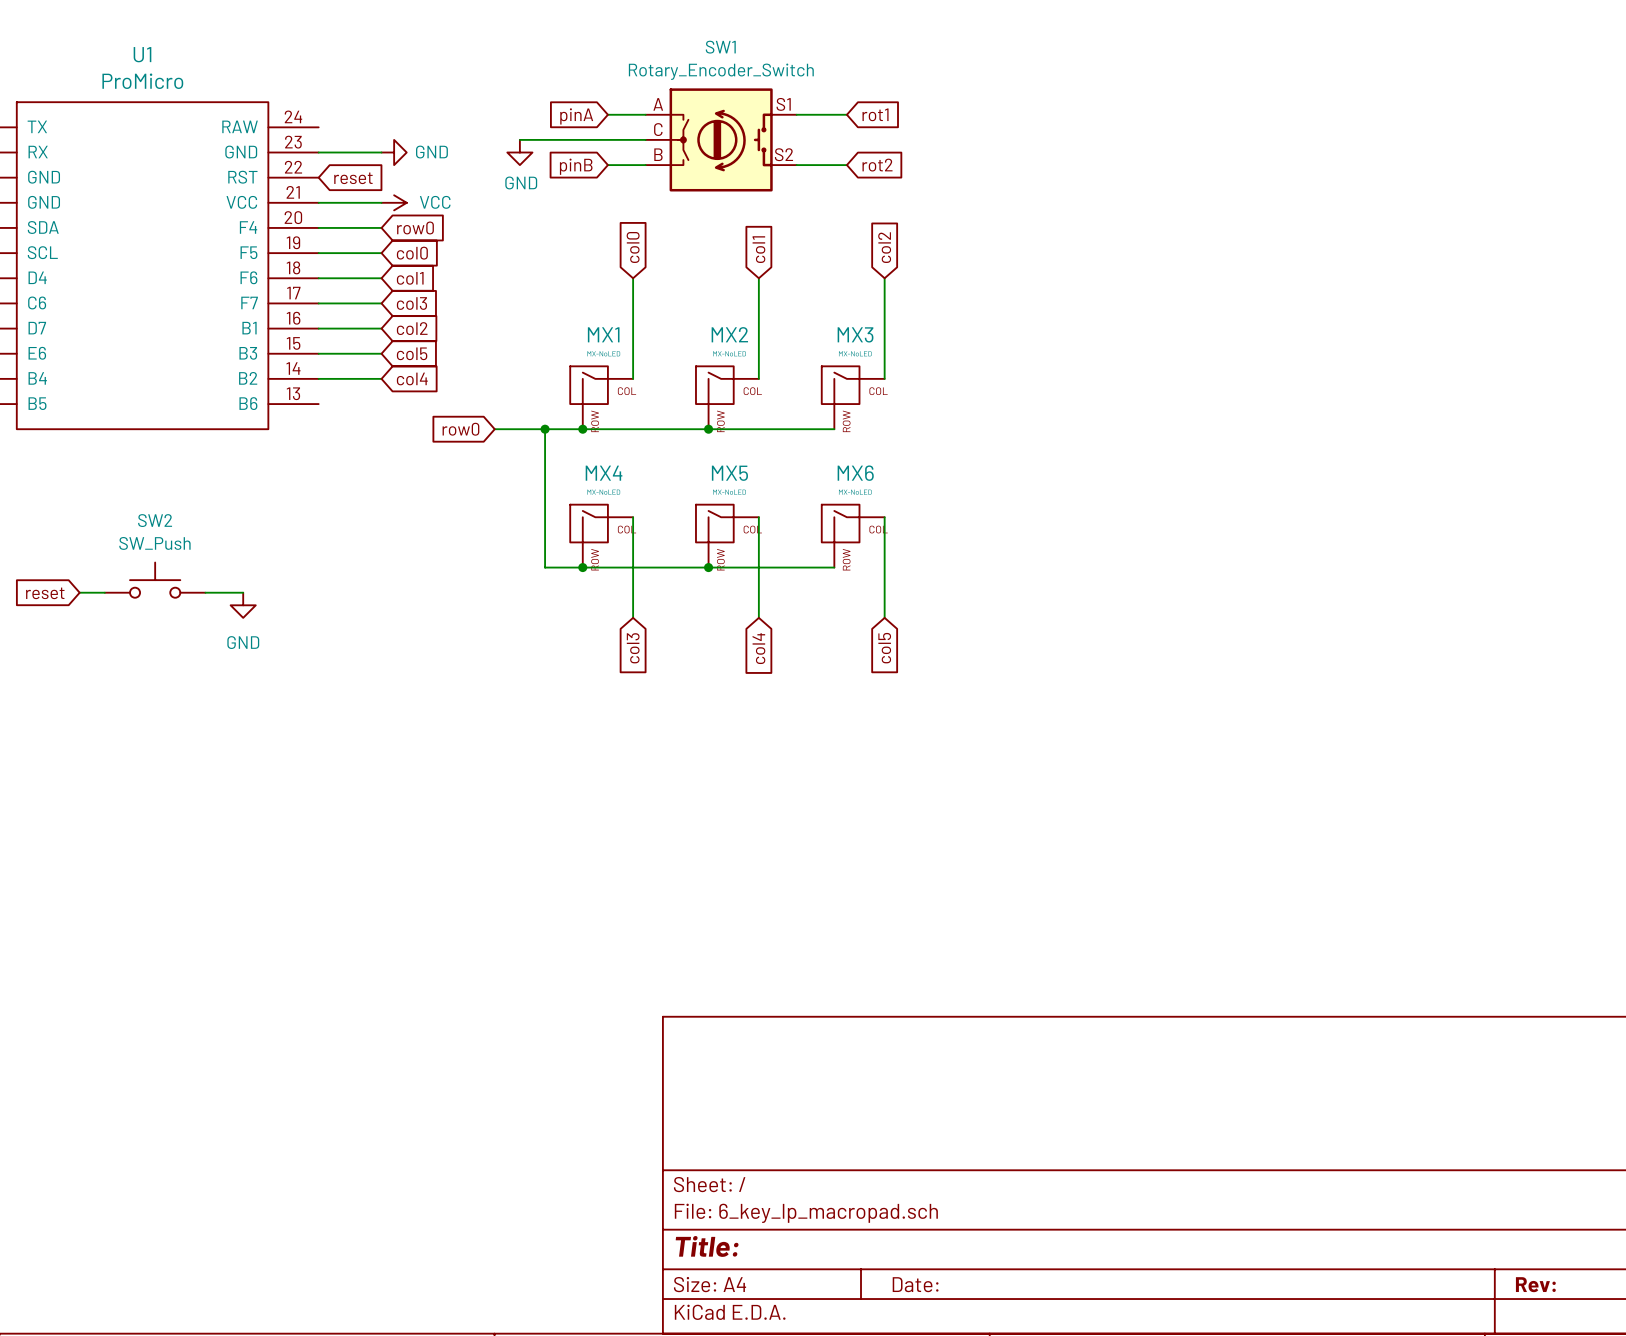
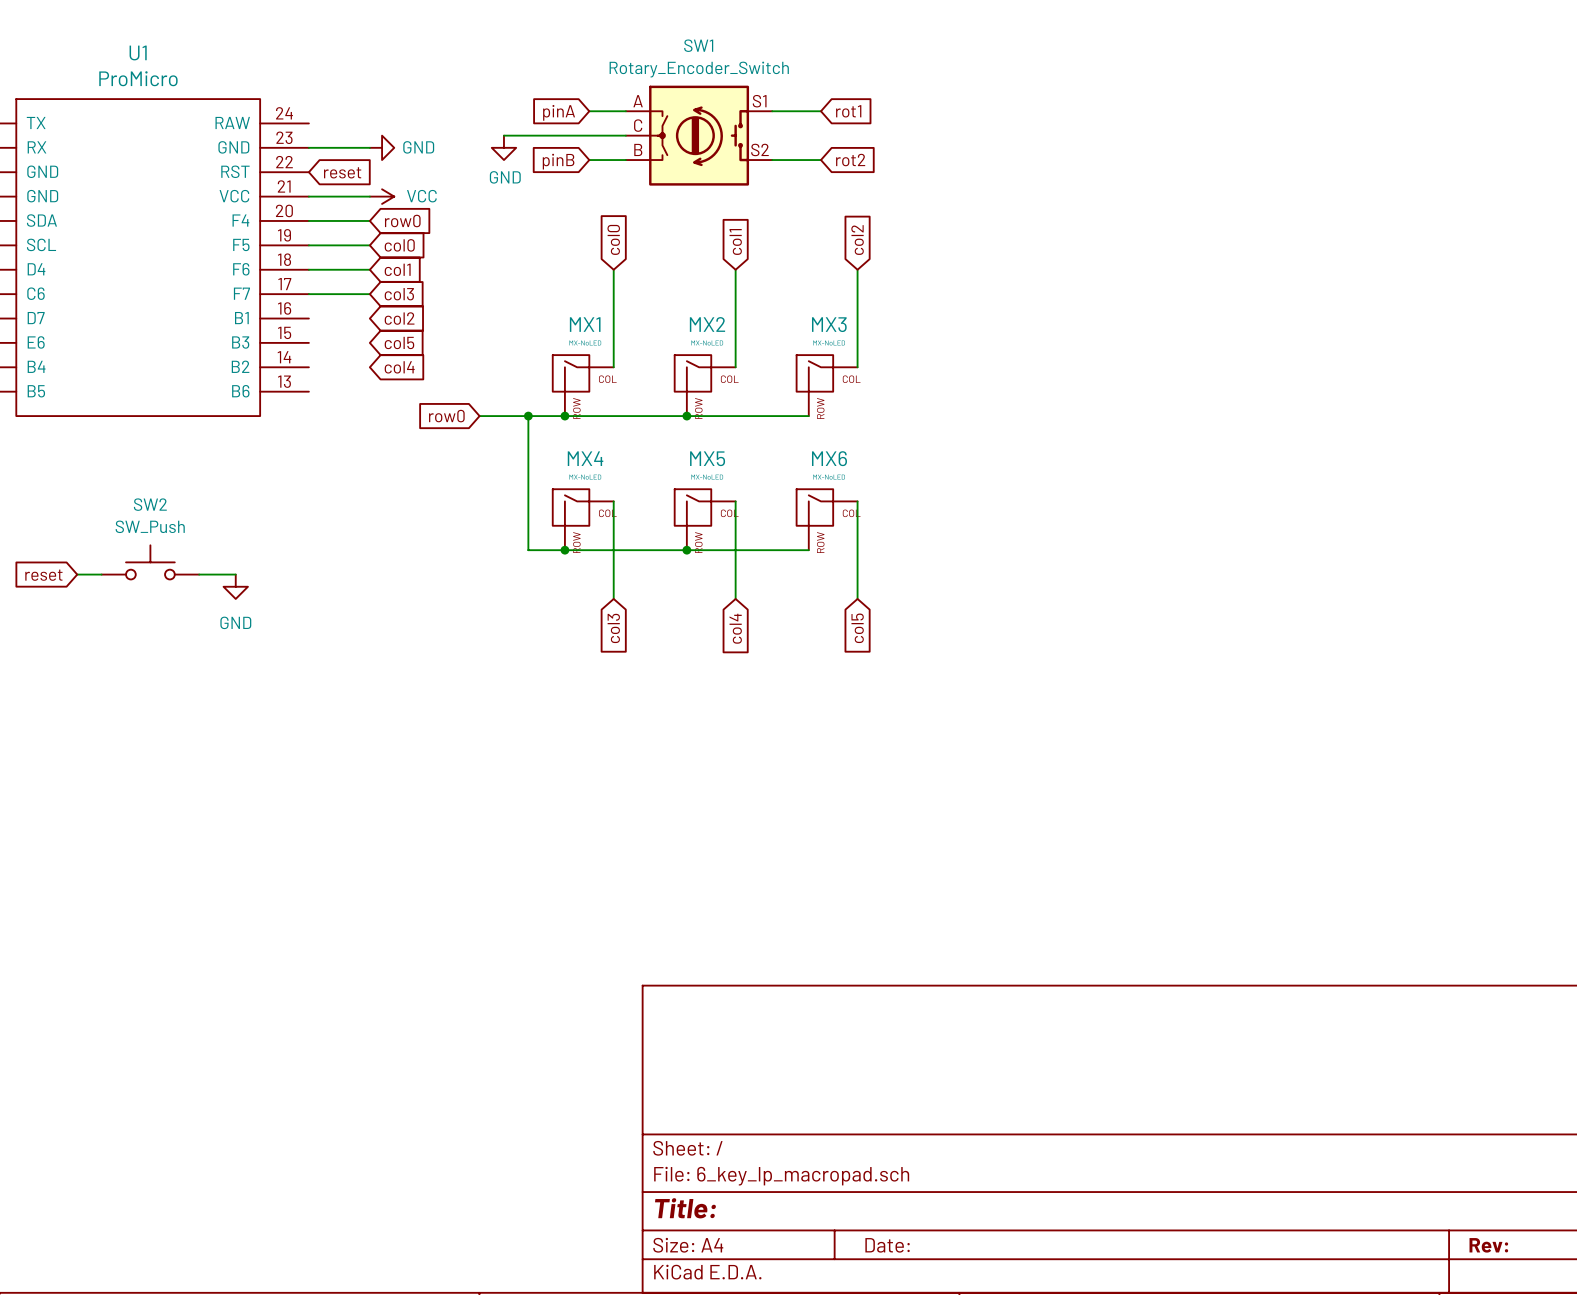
wire: (318, 328) (381, 328) -> none
wire: (318, 353) (381, 353) -> none
wire: (318, 378) (381, 378) -> none

